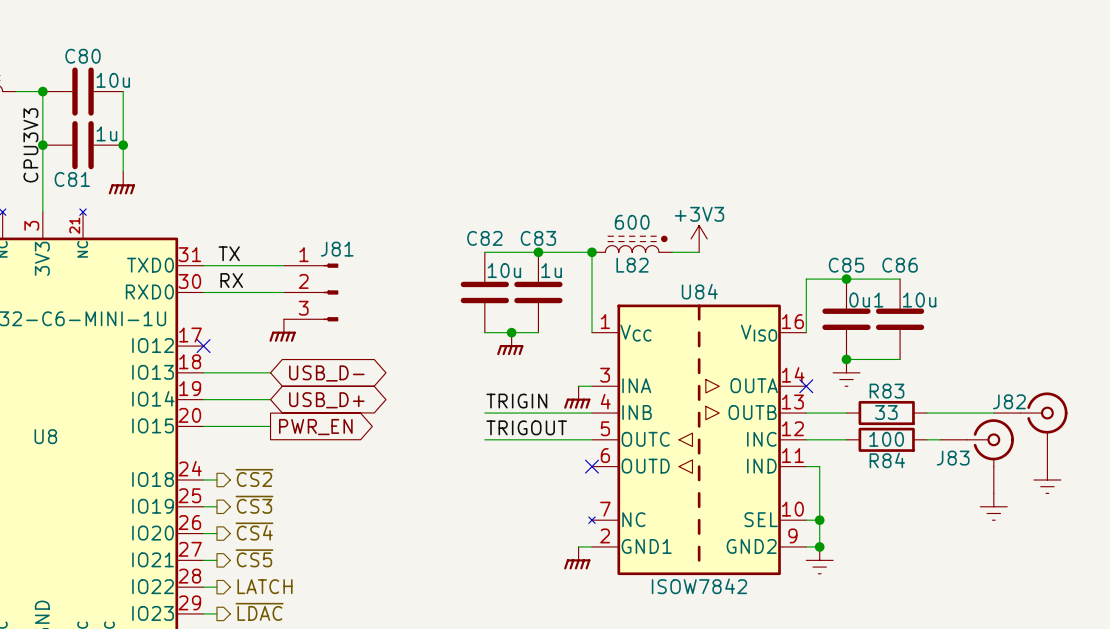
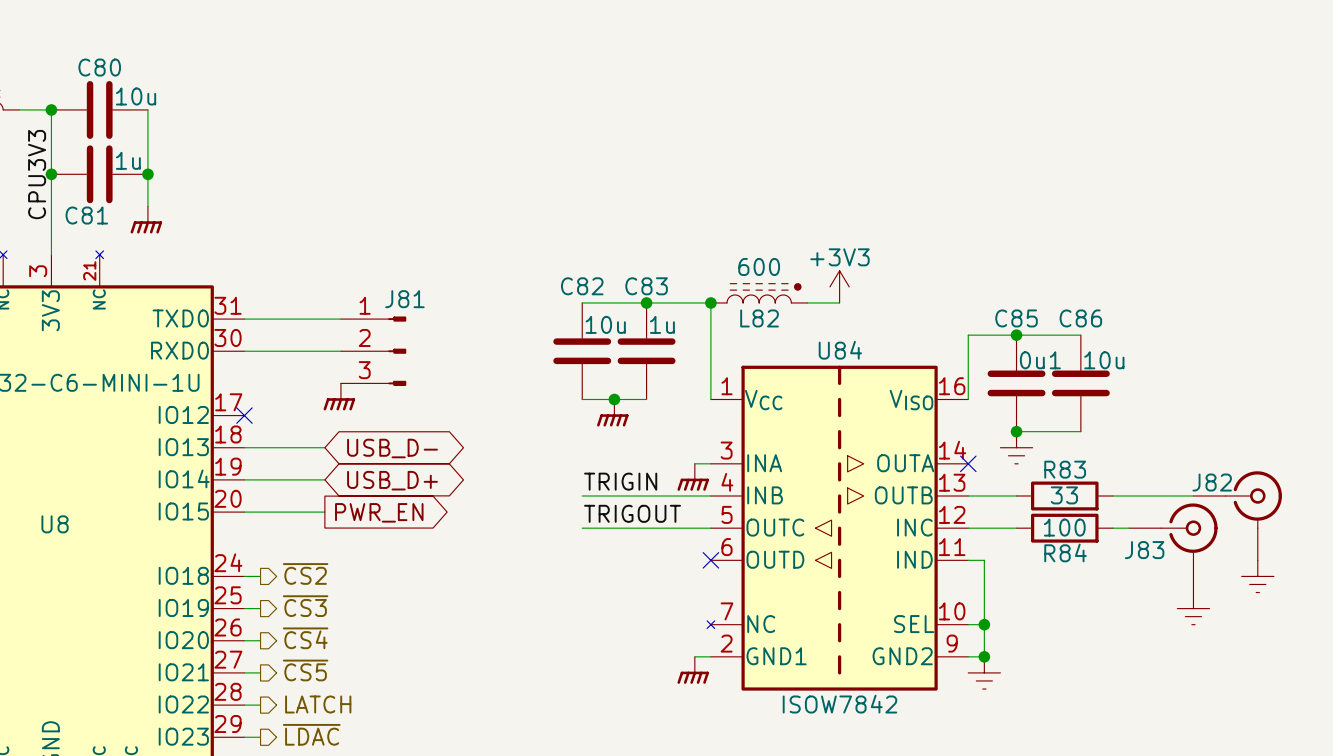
label: TX (229, 253) -> none
label: RX (231, 280) -> none

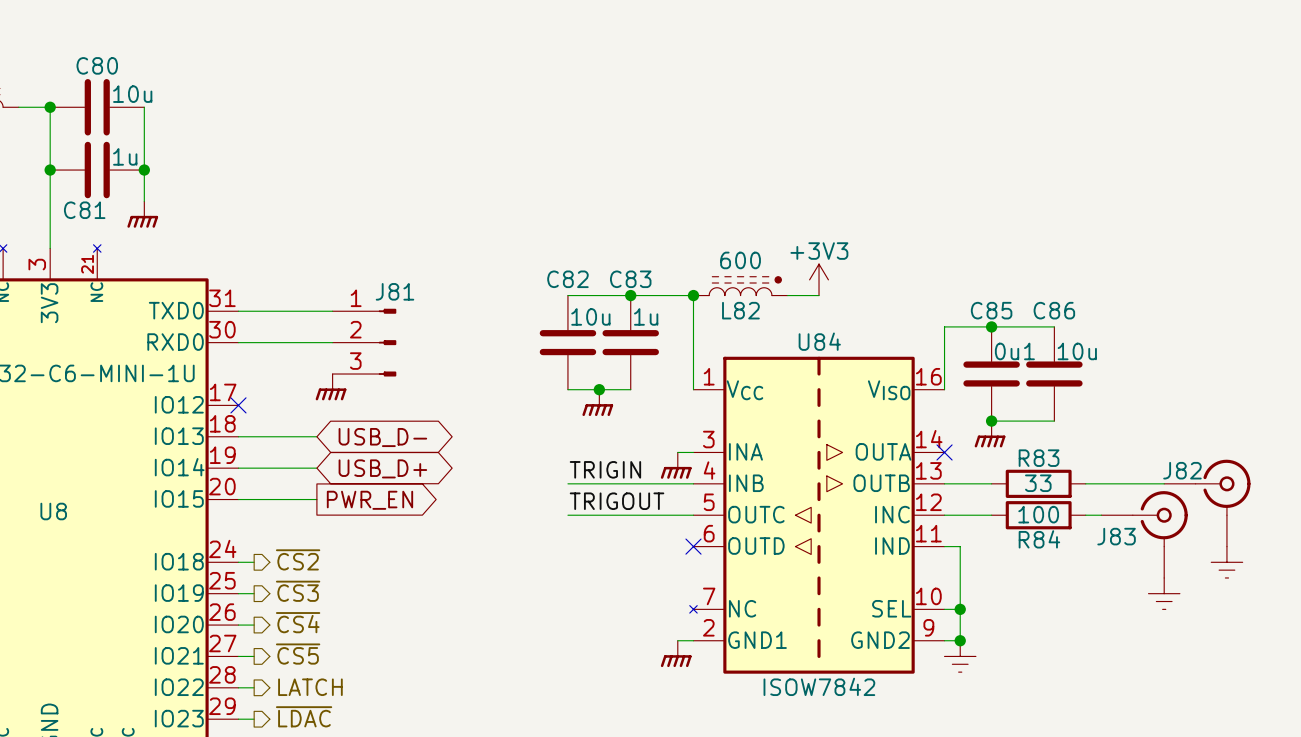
label: CPU3V3 (37, 174) -> none
power symbol shape: [1000, 431, 1033, 464] -> [974, 421, 1006, 448]

